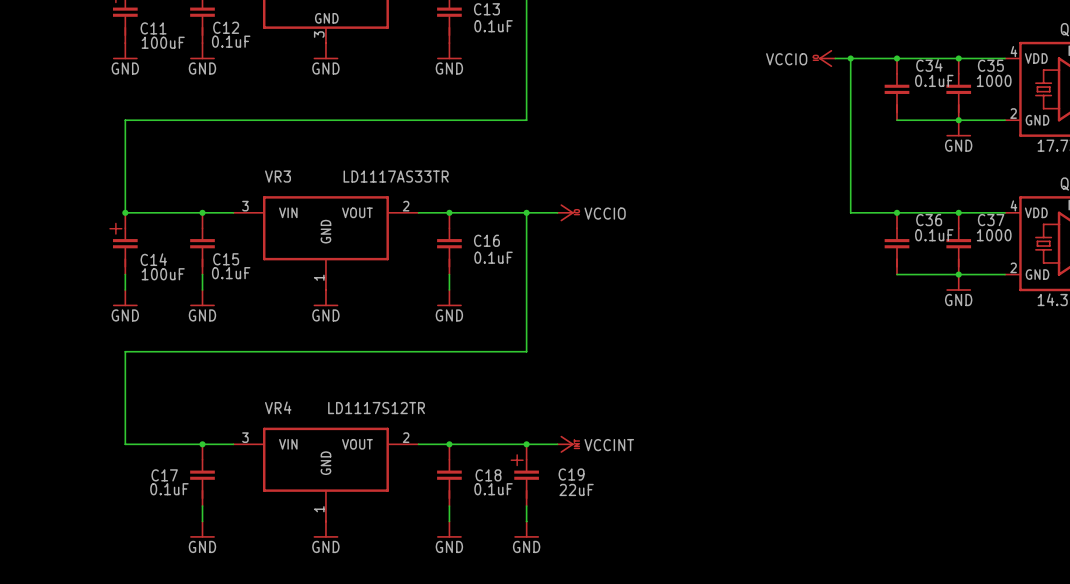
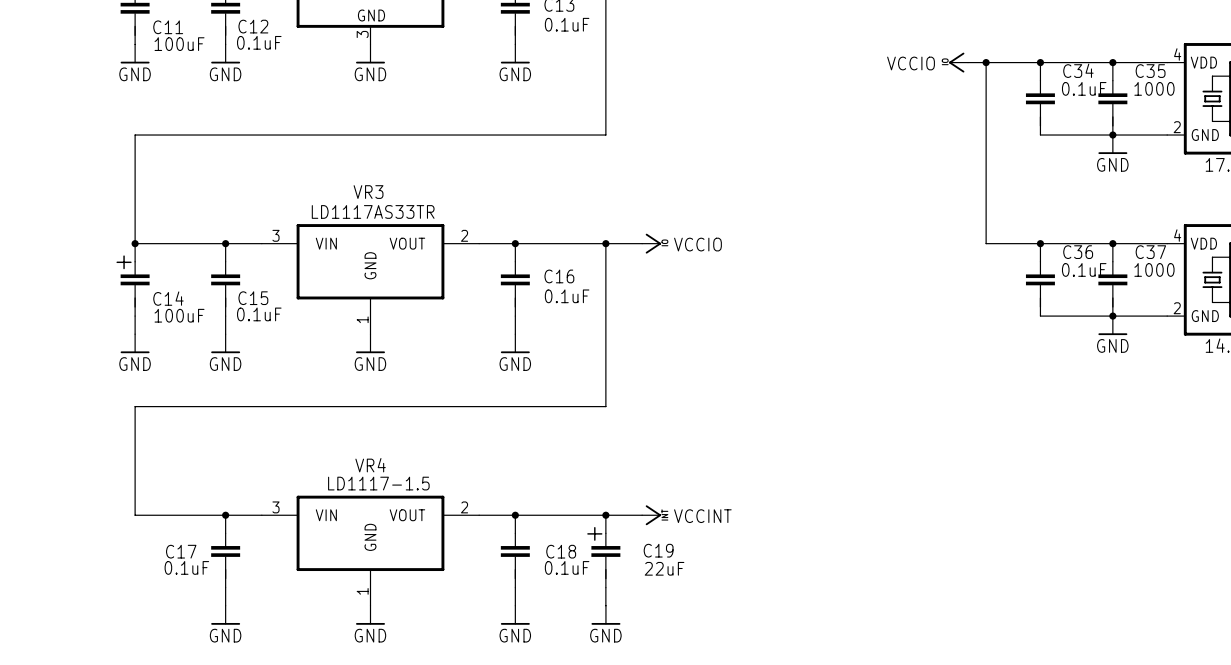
VR3 name position: VR3 (278, 176) -> VR3 (368, 192)
VR3 value position: LD1117AS33TR (396, 176) -> LD1117AS33TR (373, 211)
VR4 name position: VR4 (278, 407) -> VR4 (370, 465)
VR4 value: LD1117S12TR (376, 408) -> LD1117-1.5 (378, 483)

